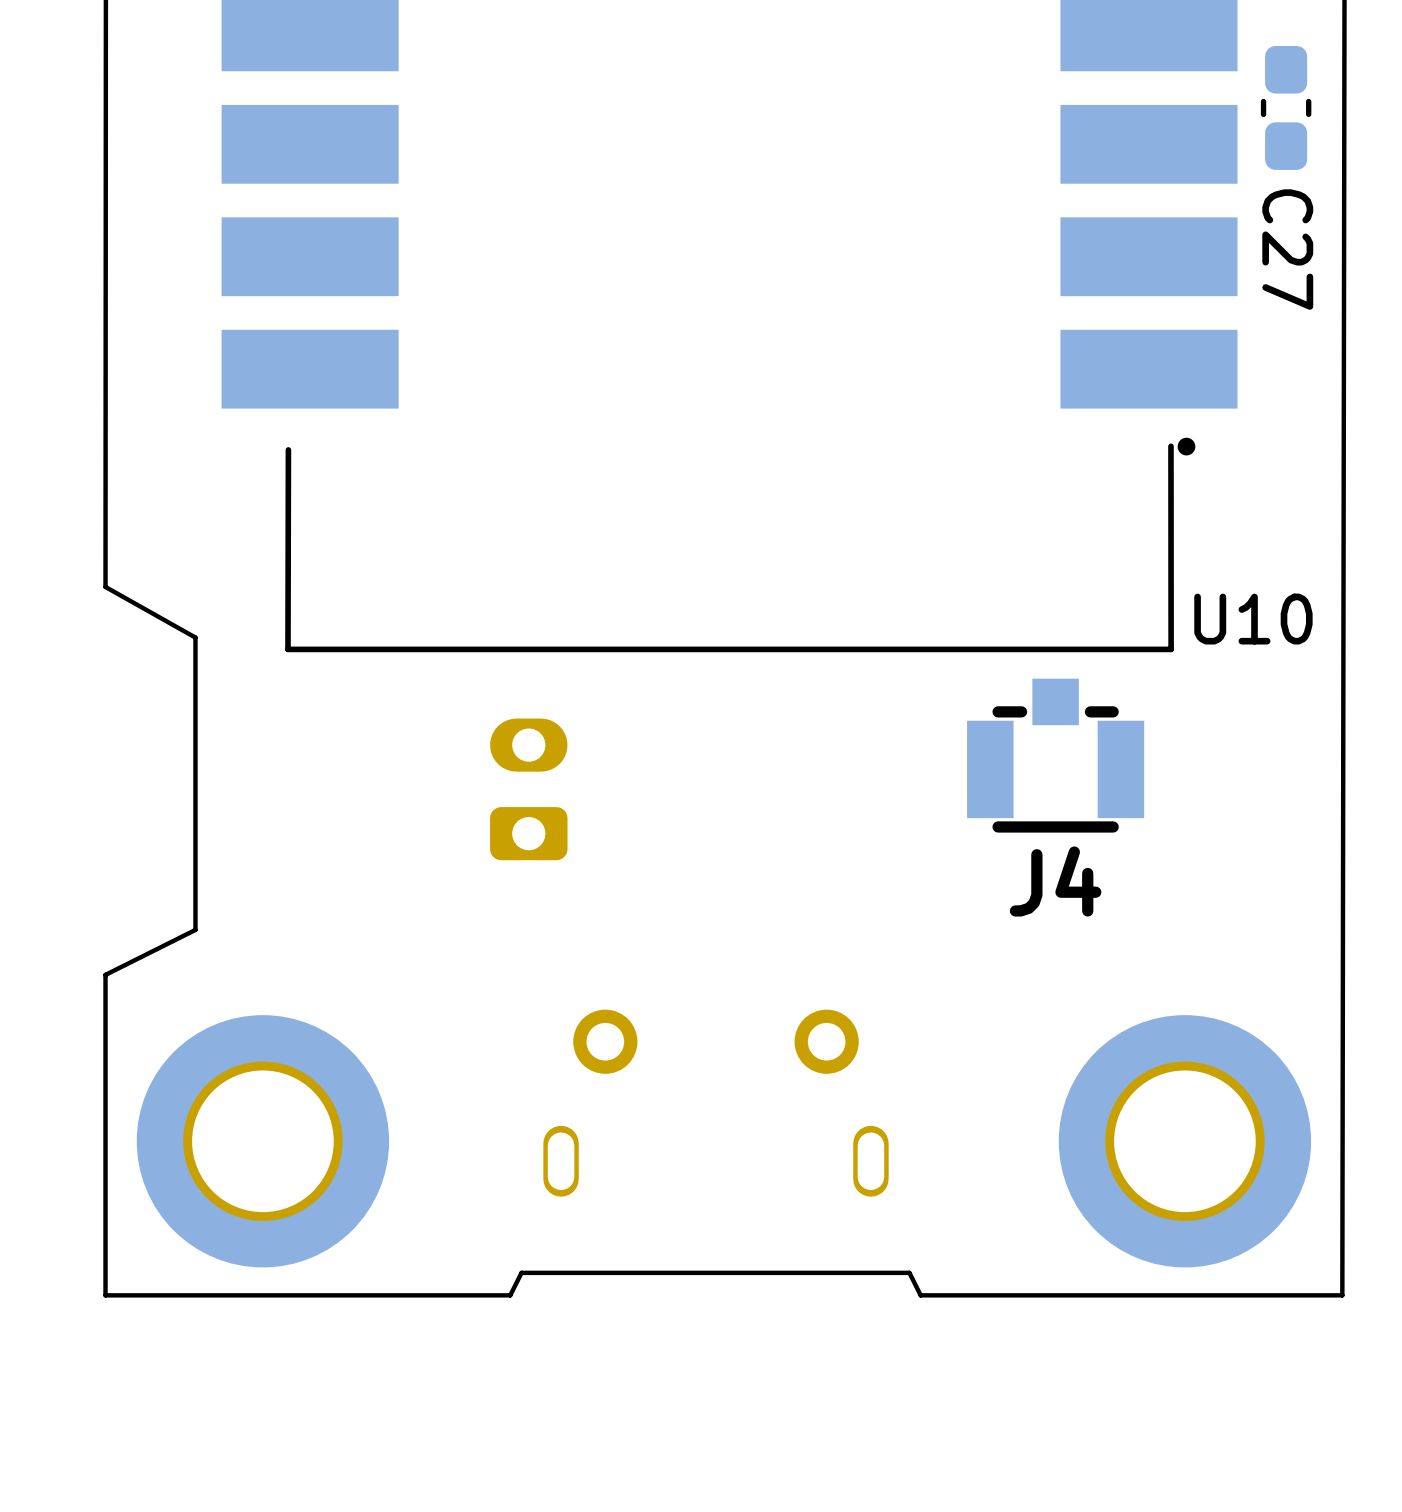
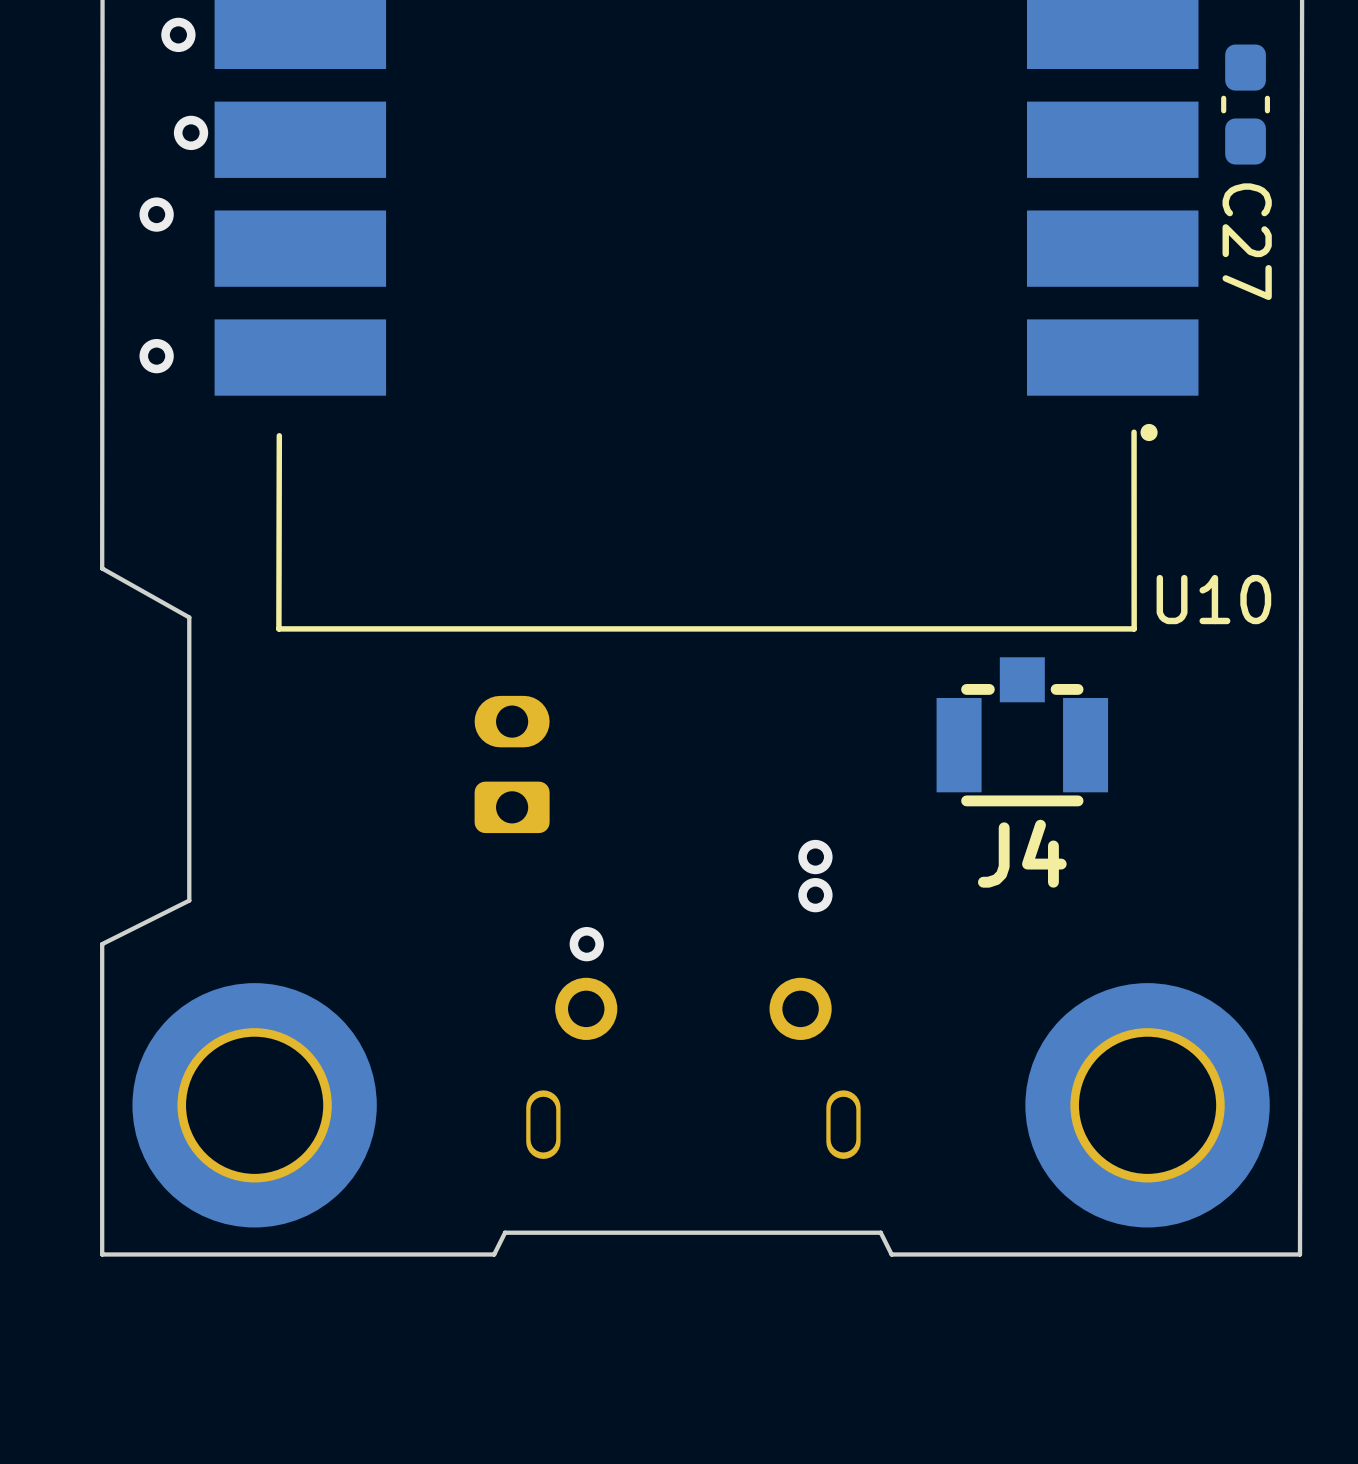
via: none -> (178, 34)
via: none -> (191, 132)
via: none -> (156, 214)
via: none -> (156, 356)
via: none -> (815, 857)
via: none -> (815, 895)
via: none -> (586, 944)

